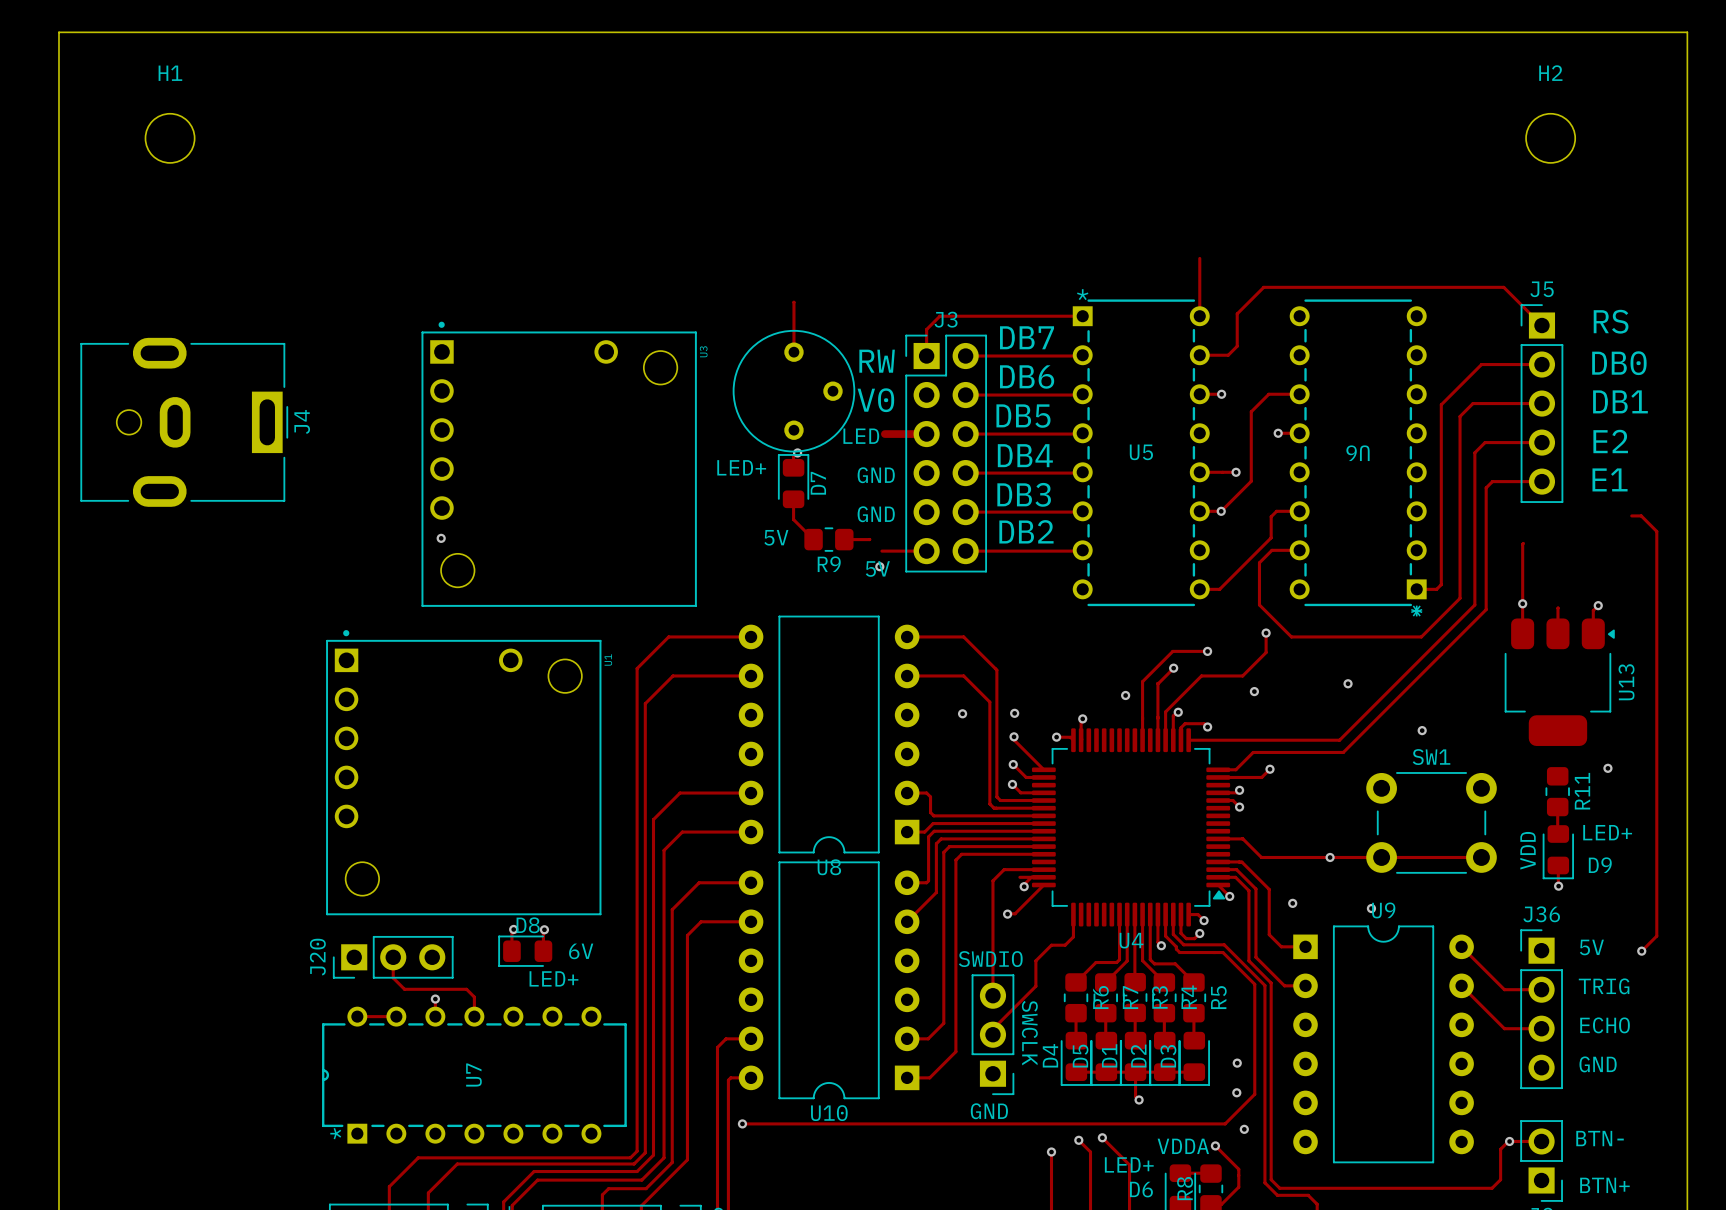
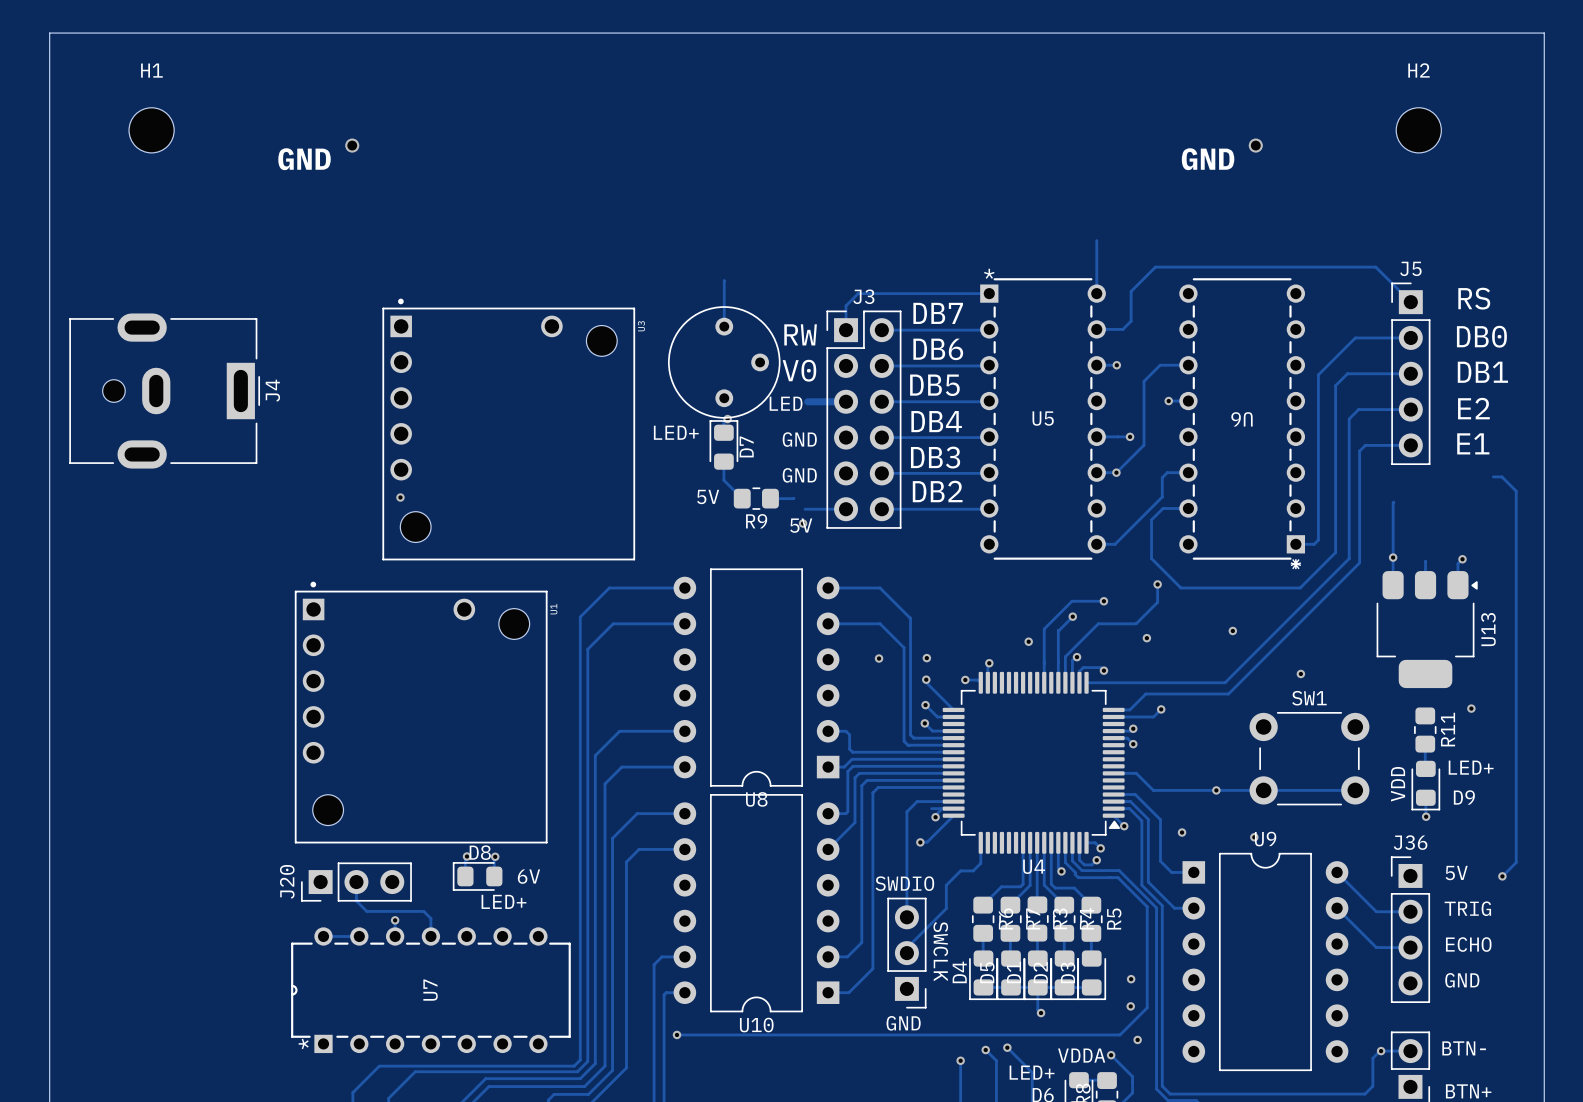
via: none -> (352, 145)
via: none -> (1255, 145)
text: none -> GND (304, 159)
text: none -> GND (1208, 159)

